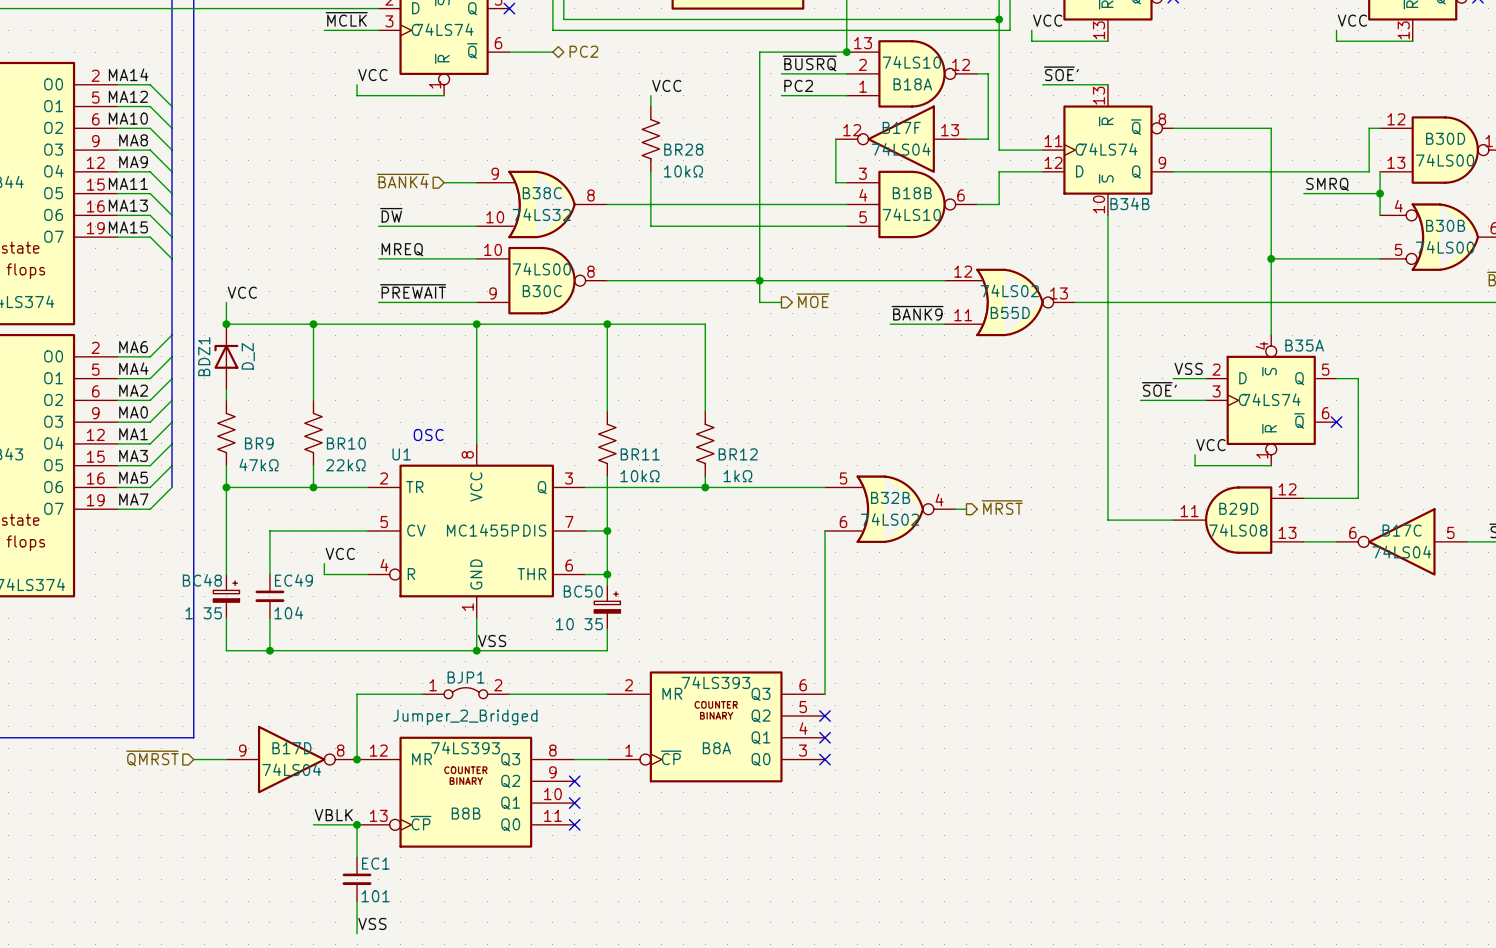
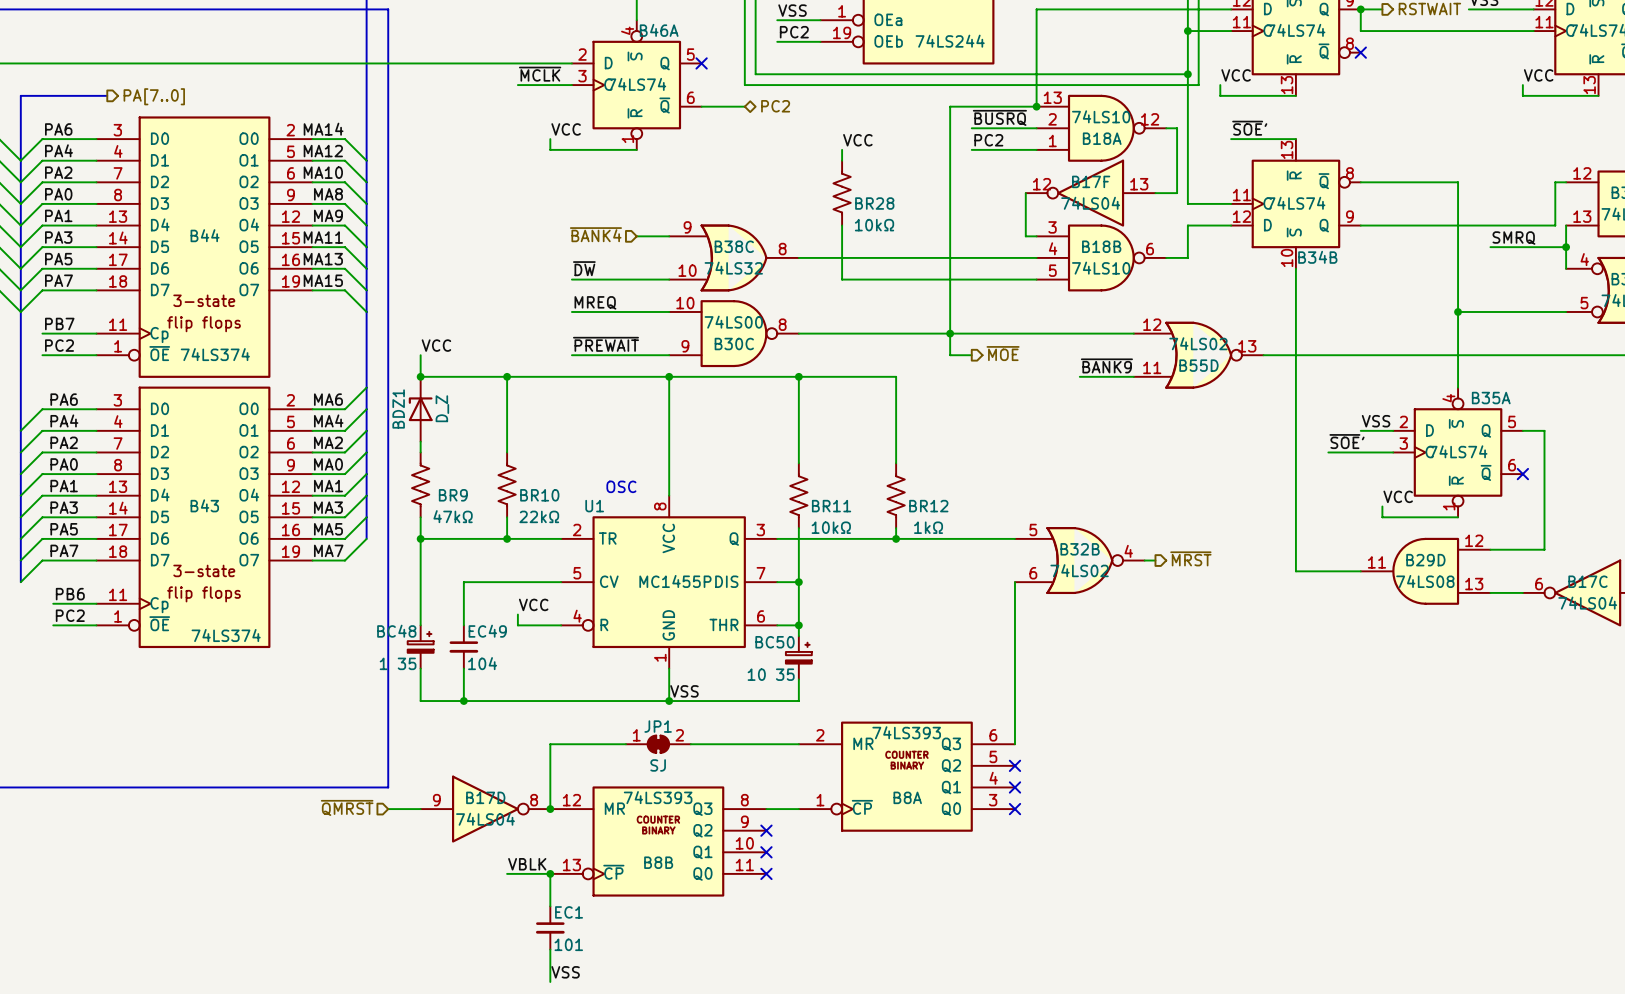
BJP1: Jumper_2_Bridged (465, 693) -> none
JP1: none -> SJ (658, 744)

